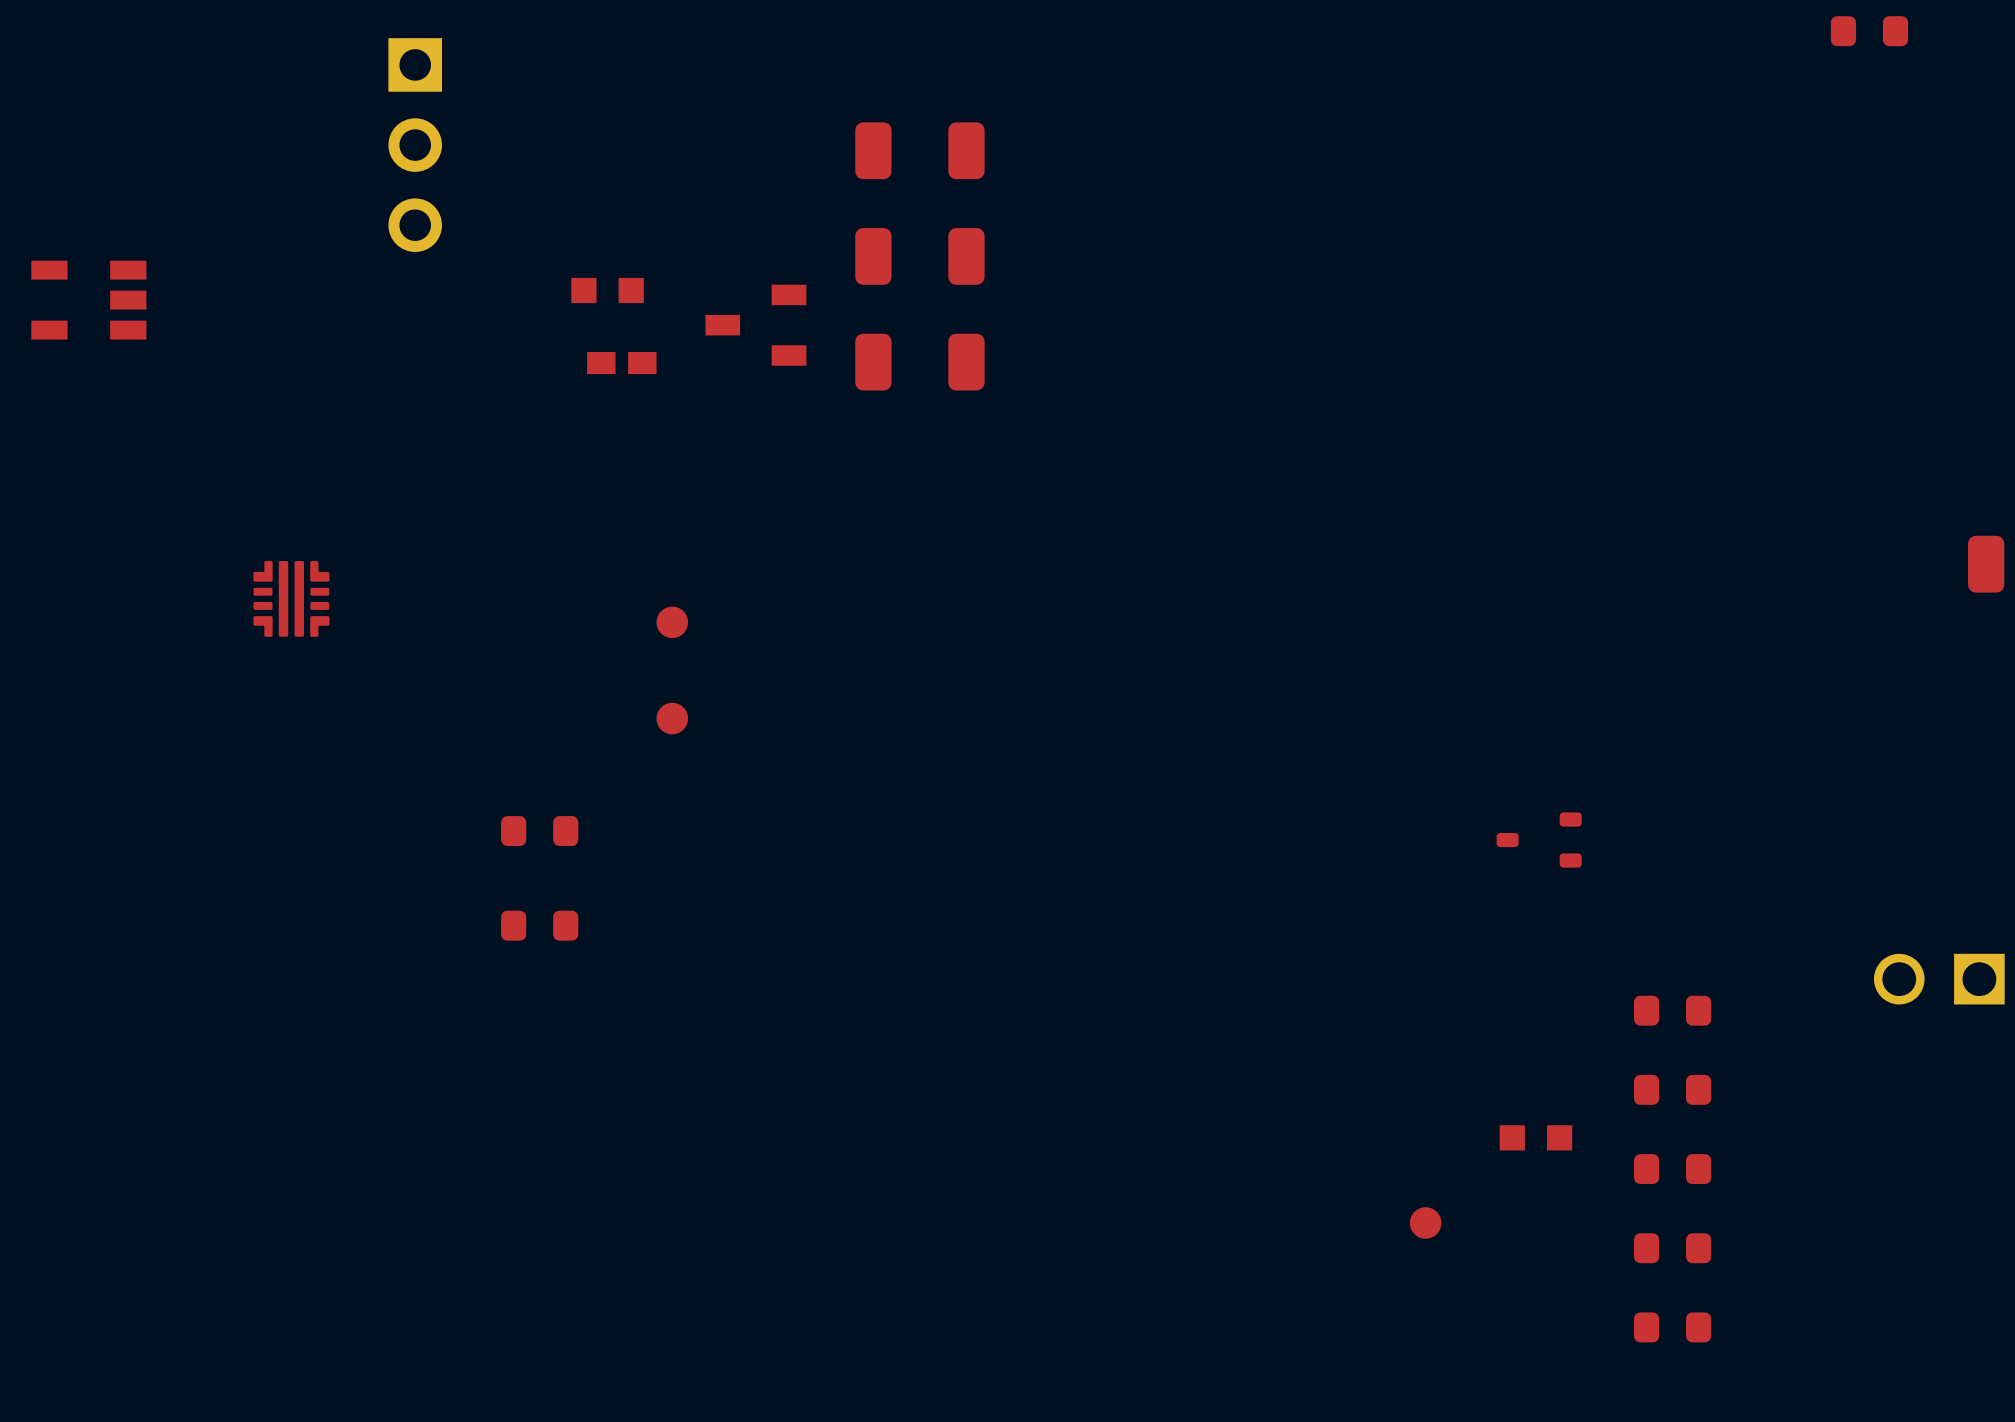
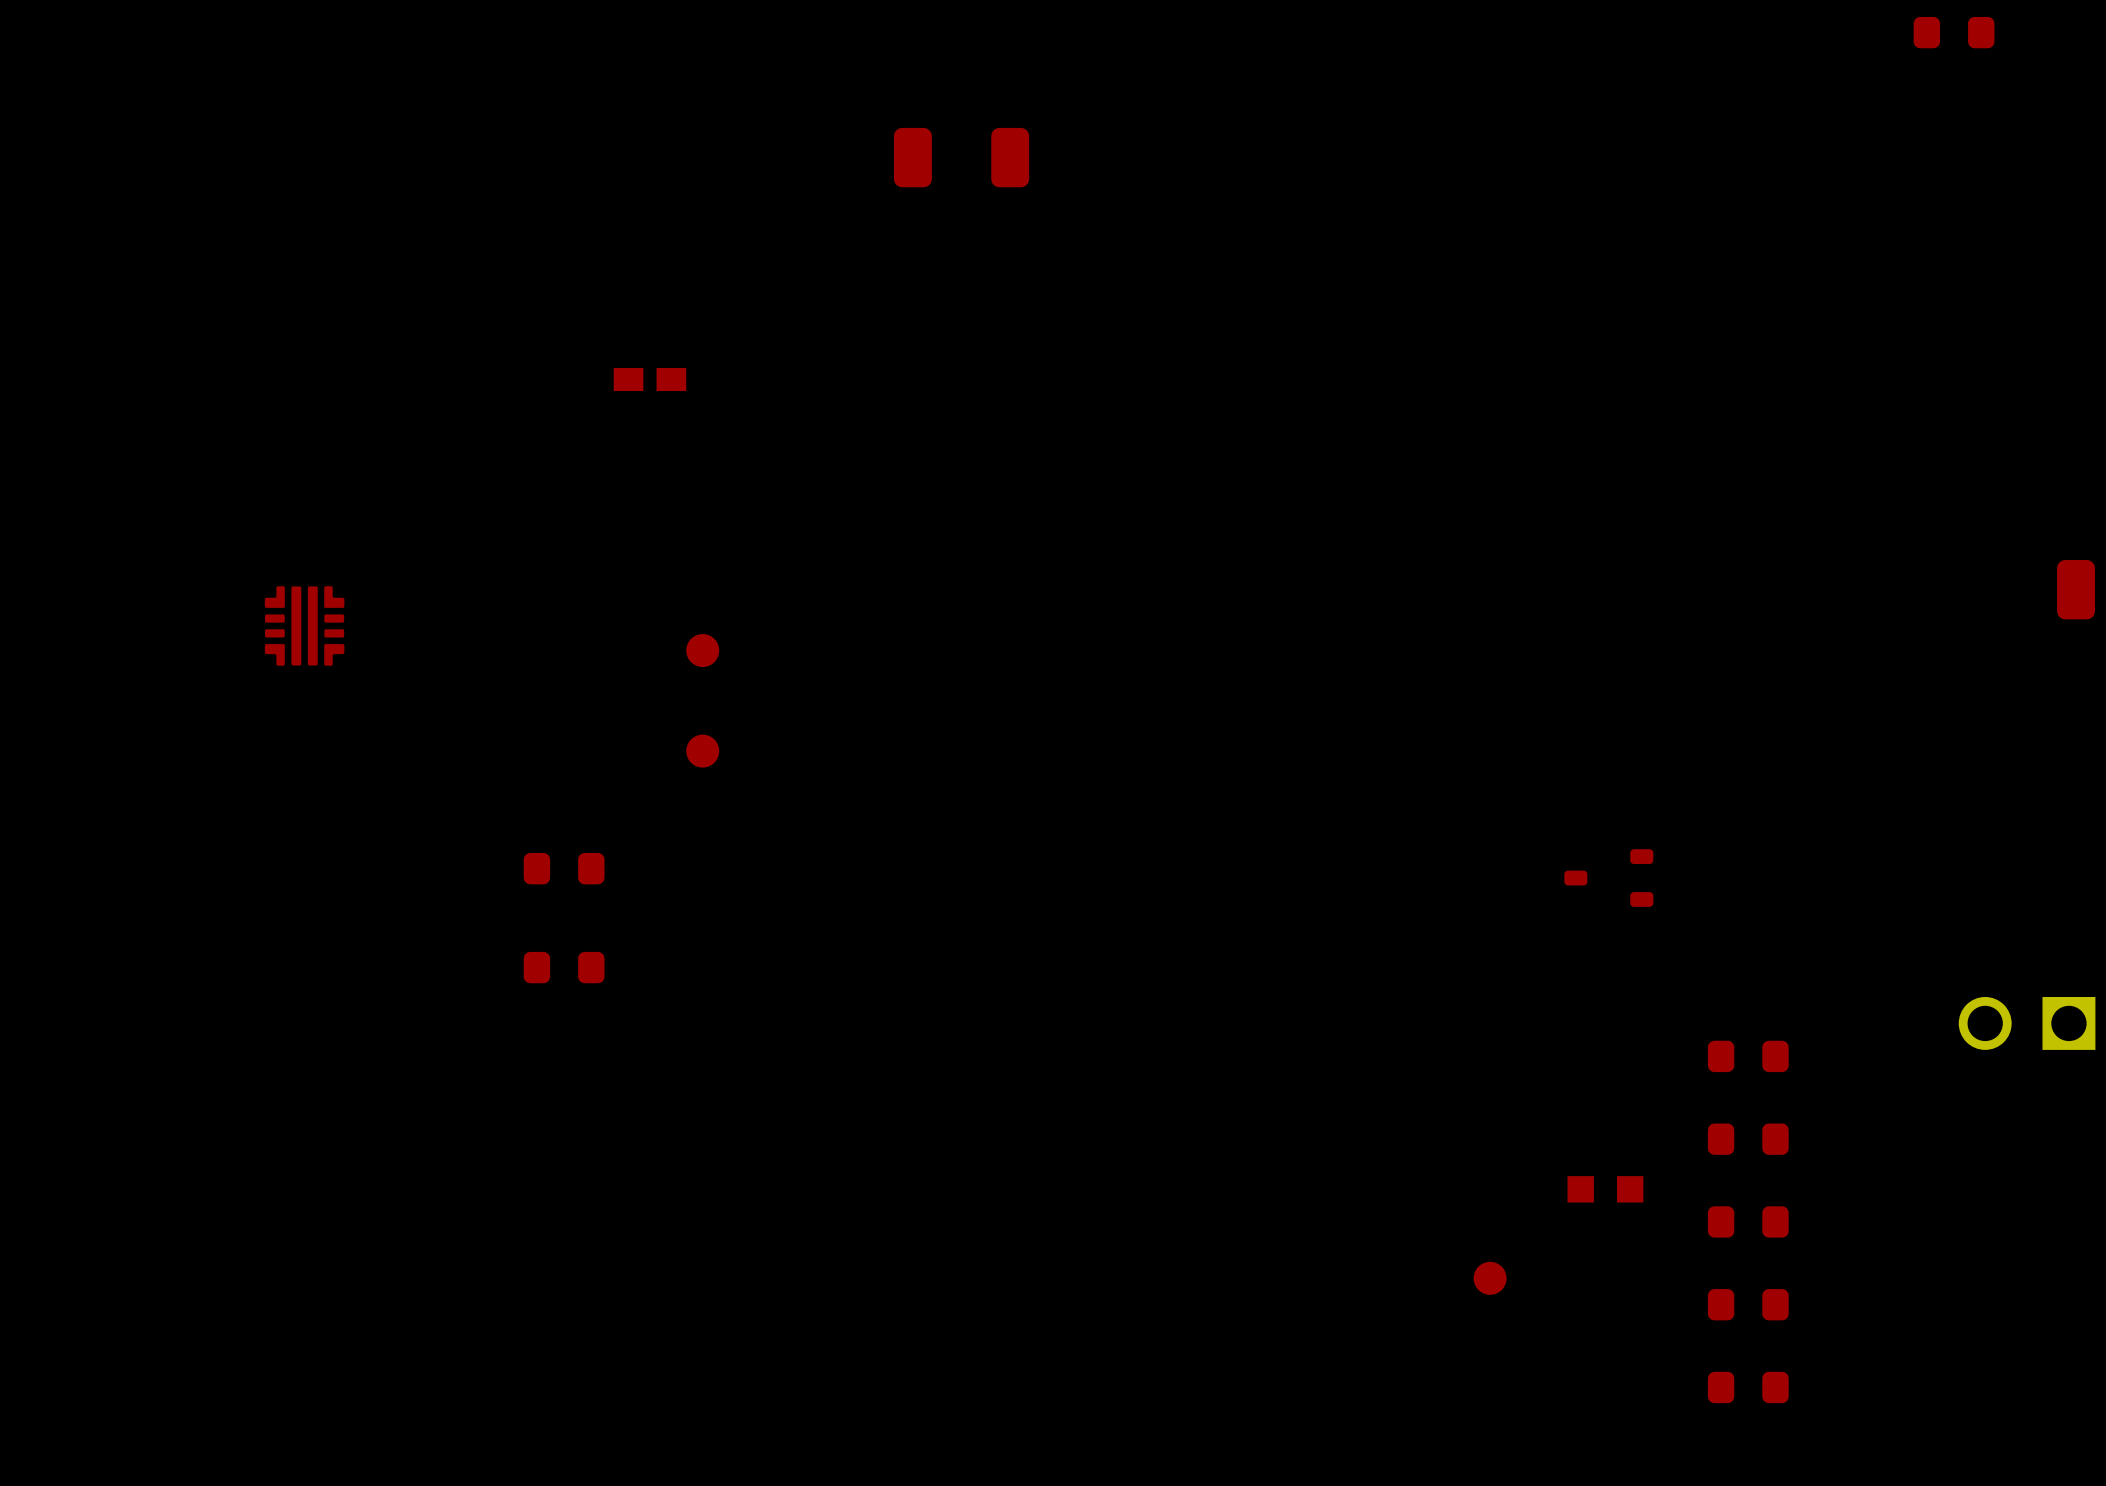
part: (415, 145) -> none
part: (919, 256) -> none
part: (607, 290) -> none
part: (88, 300) -> none
part: (755, 325) -> none
part: (919, 362) -> none

